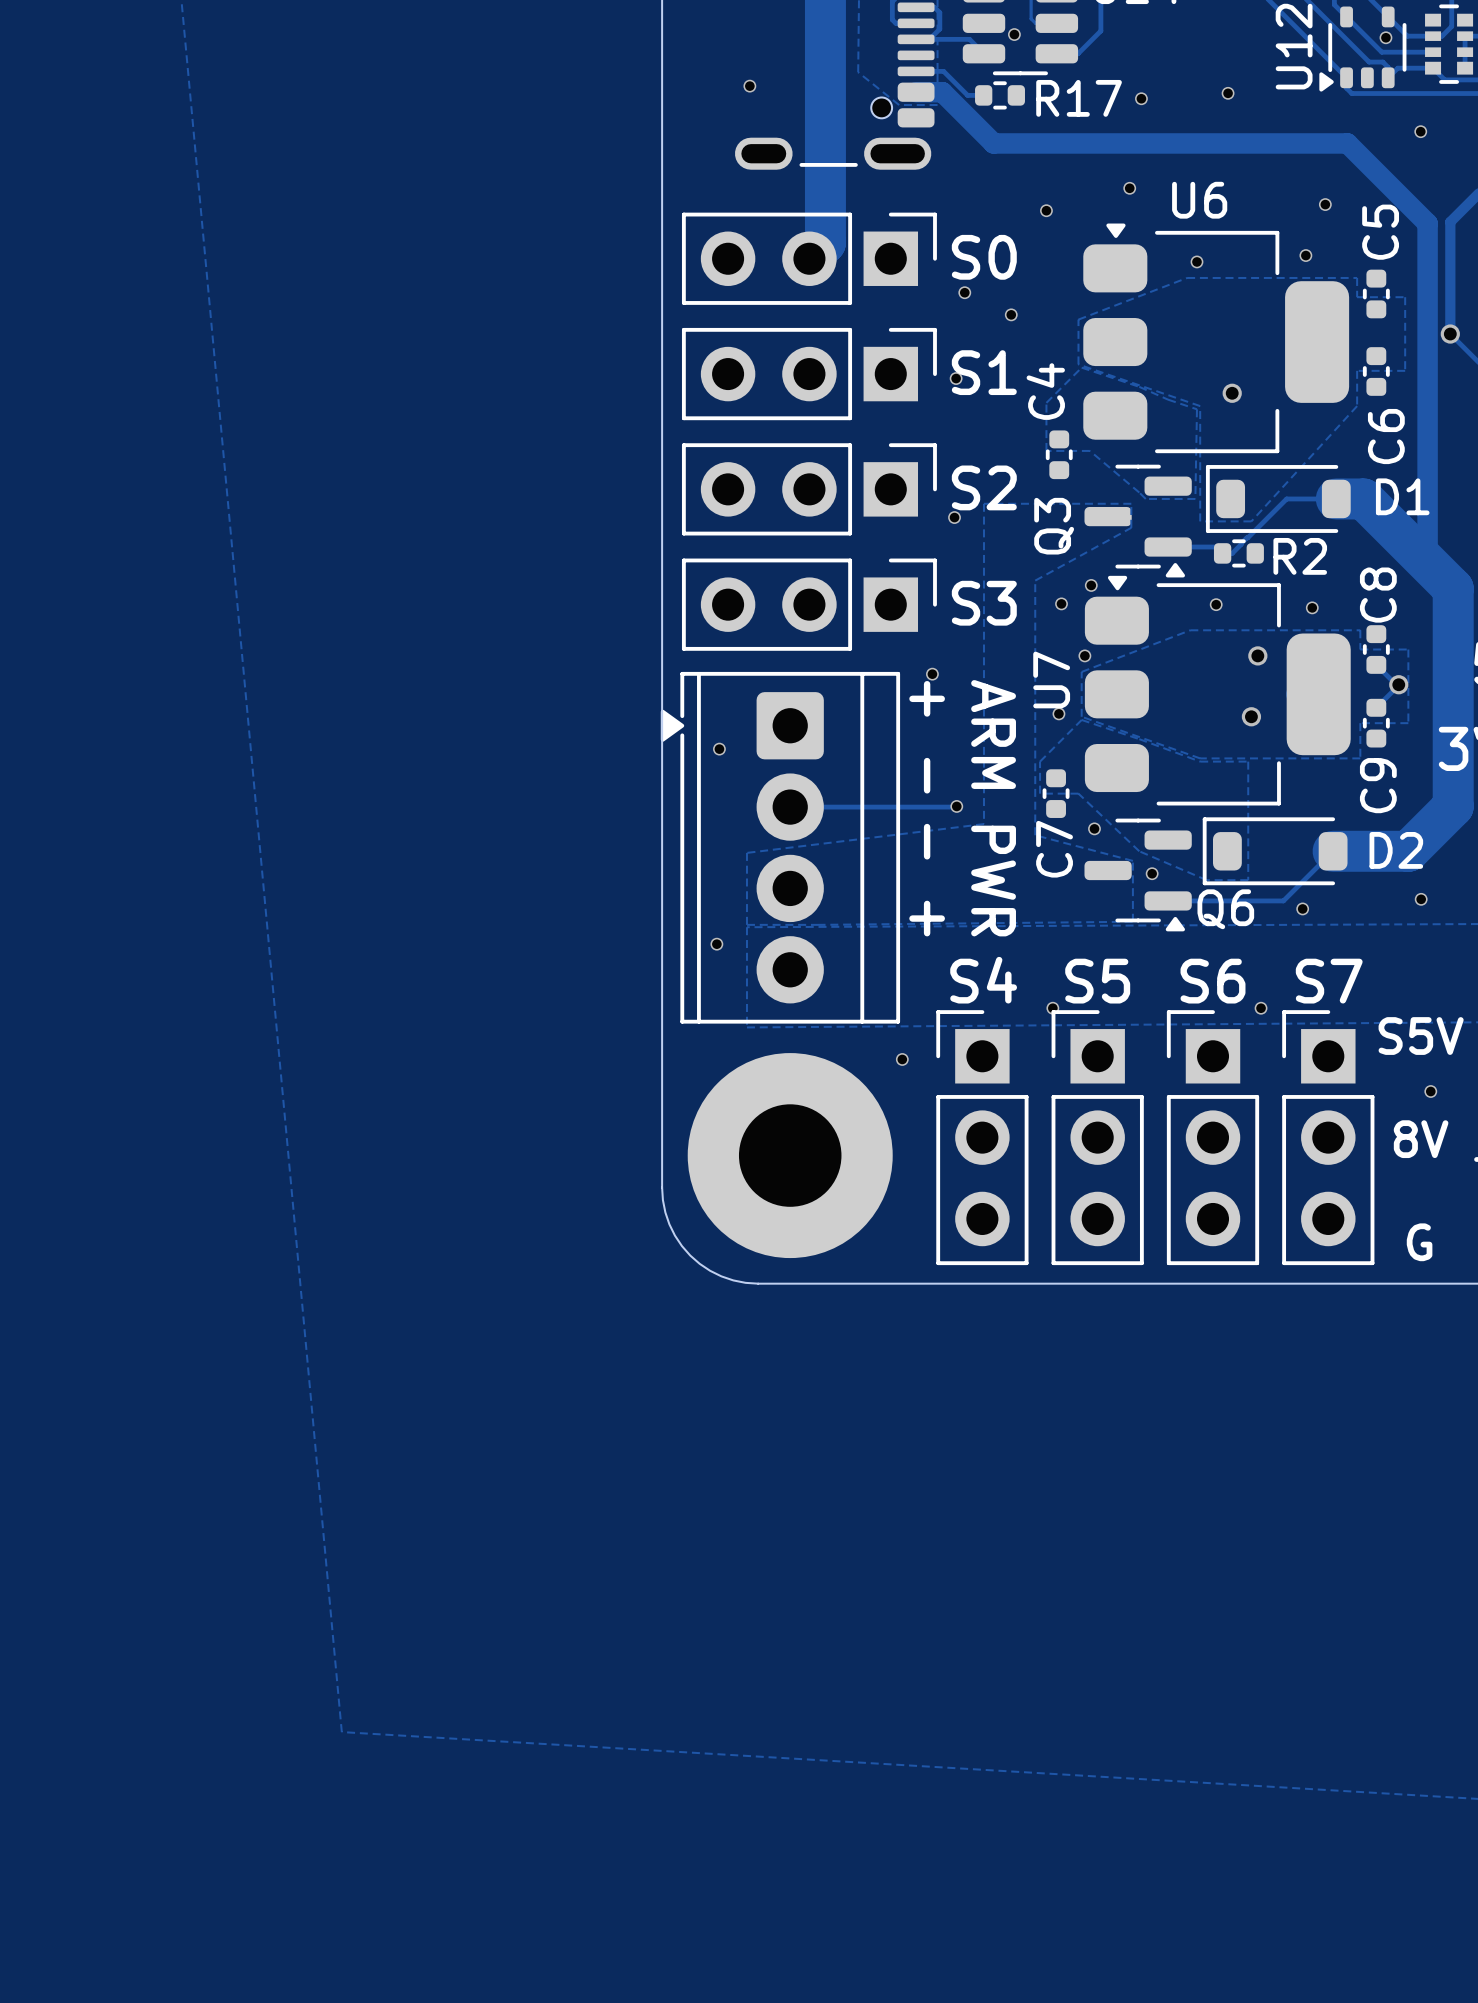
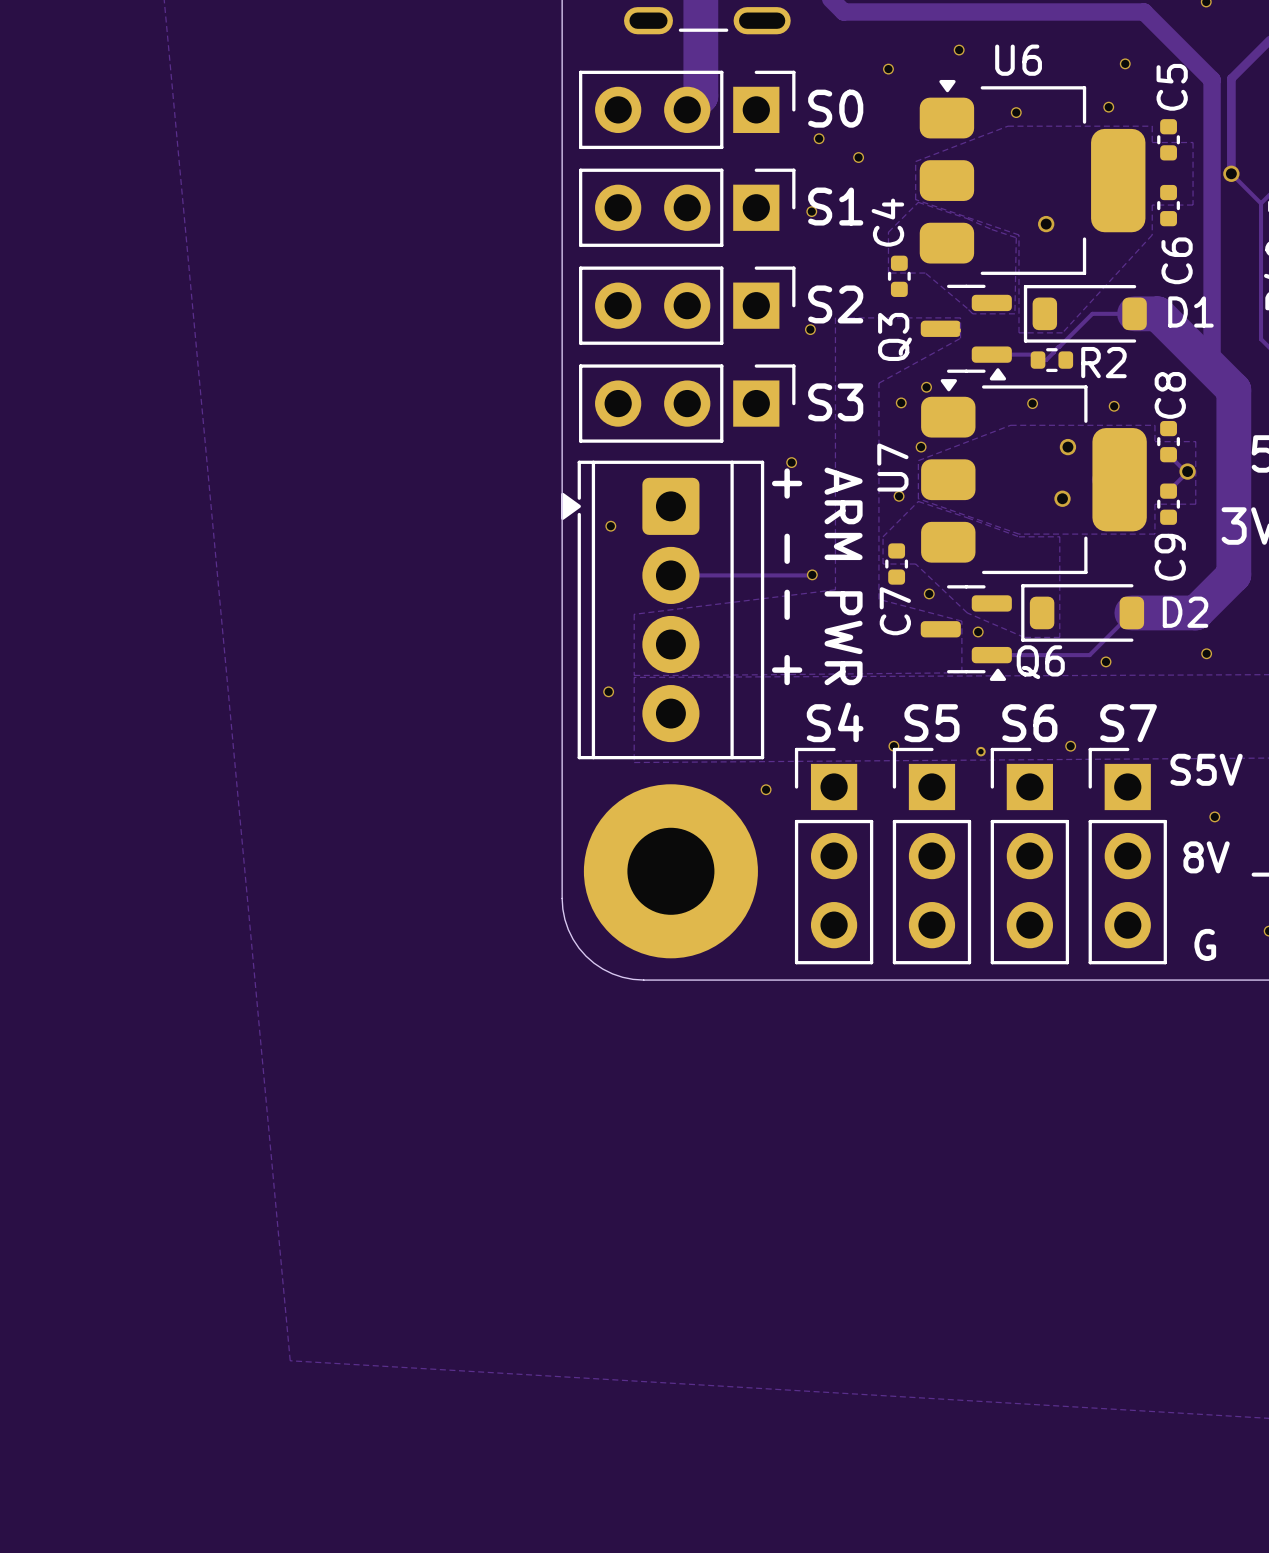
via: none -> (980, 751)

